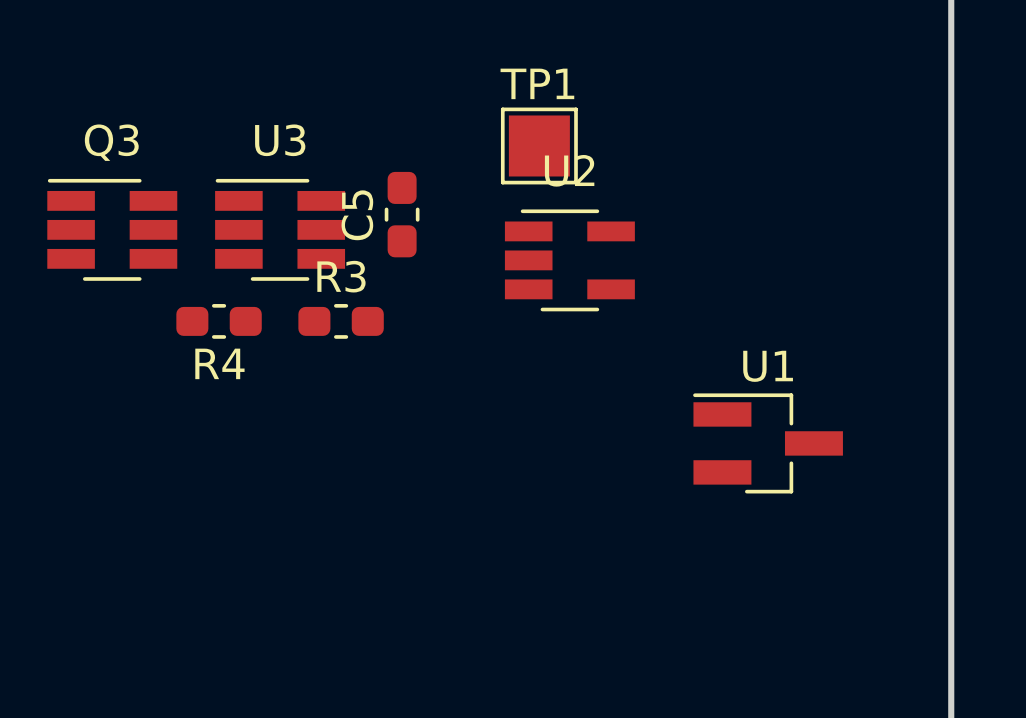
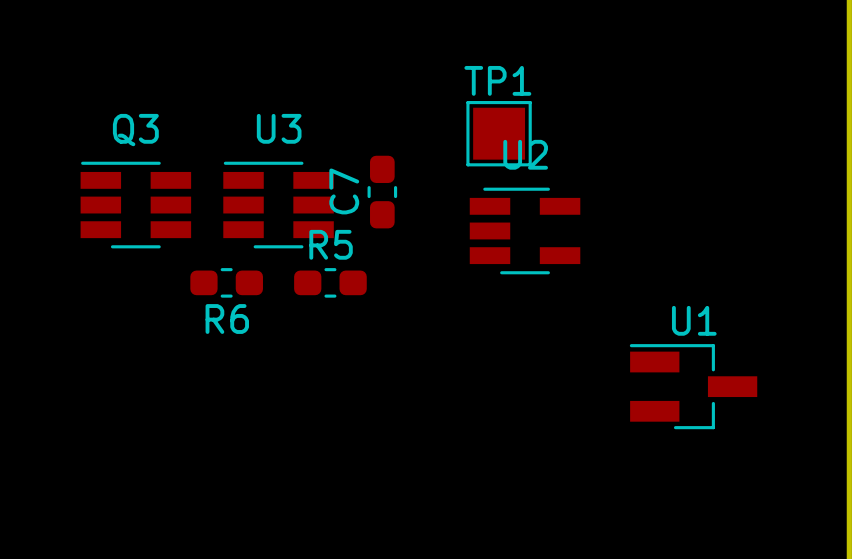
C5 name: C5 (357, 215) -> C7 (344, 191)
R3 name: R3 (341, 276) -> R5 (331, 244)
R4 name: R4 (219, 363) -> R6 (227, 319)

